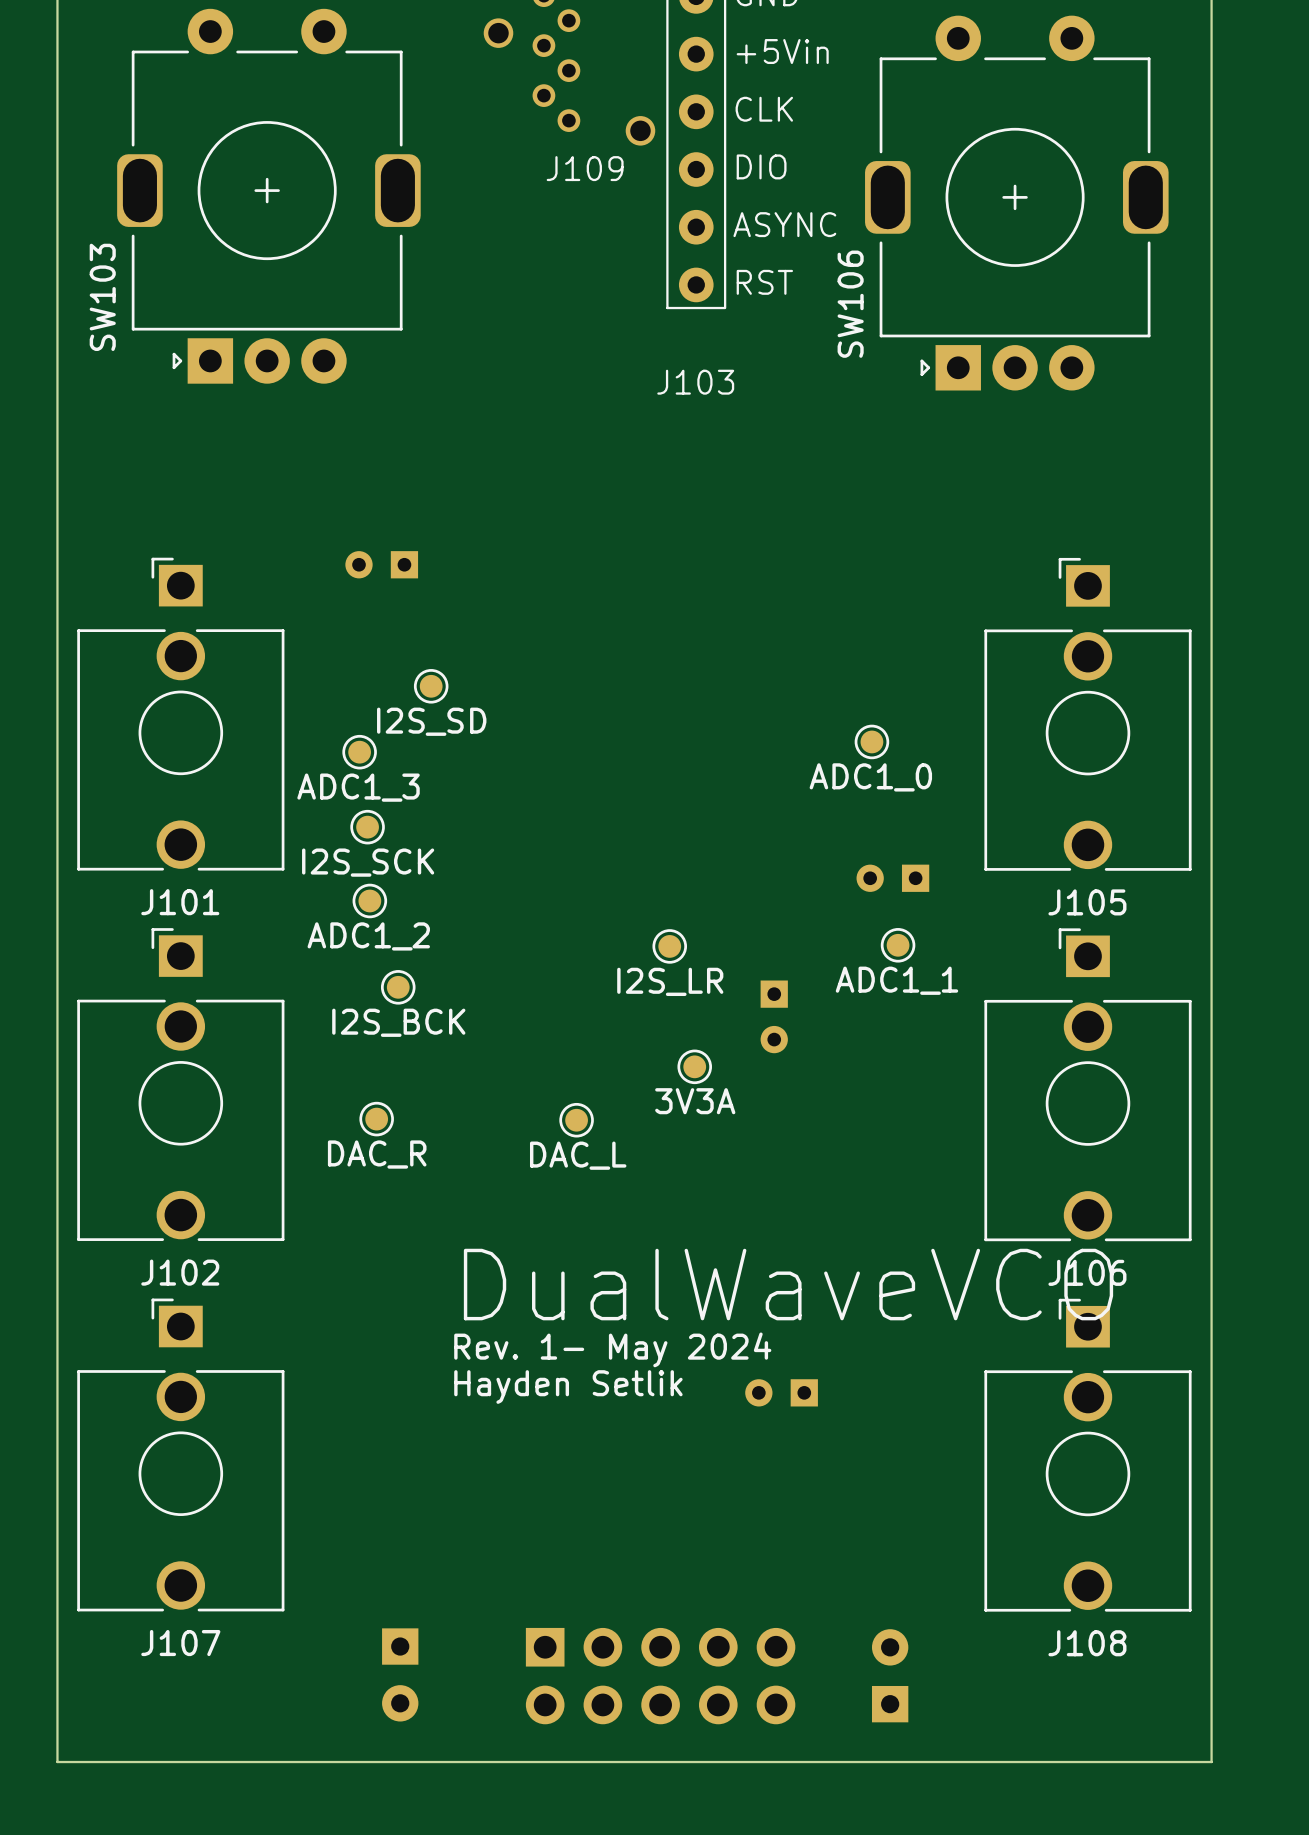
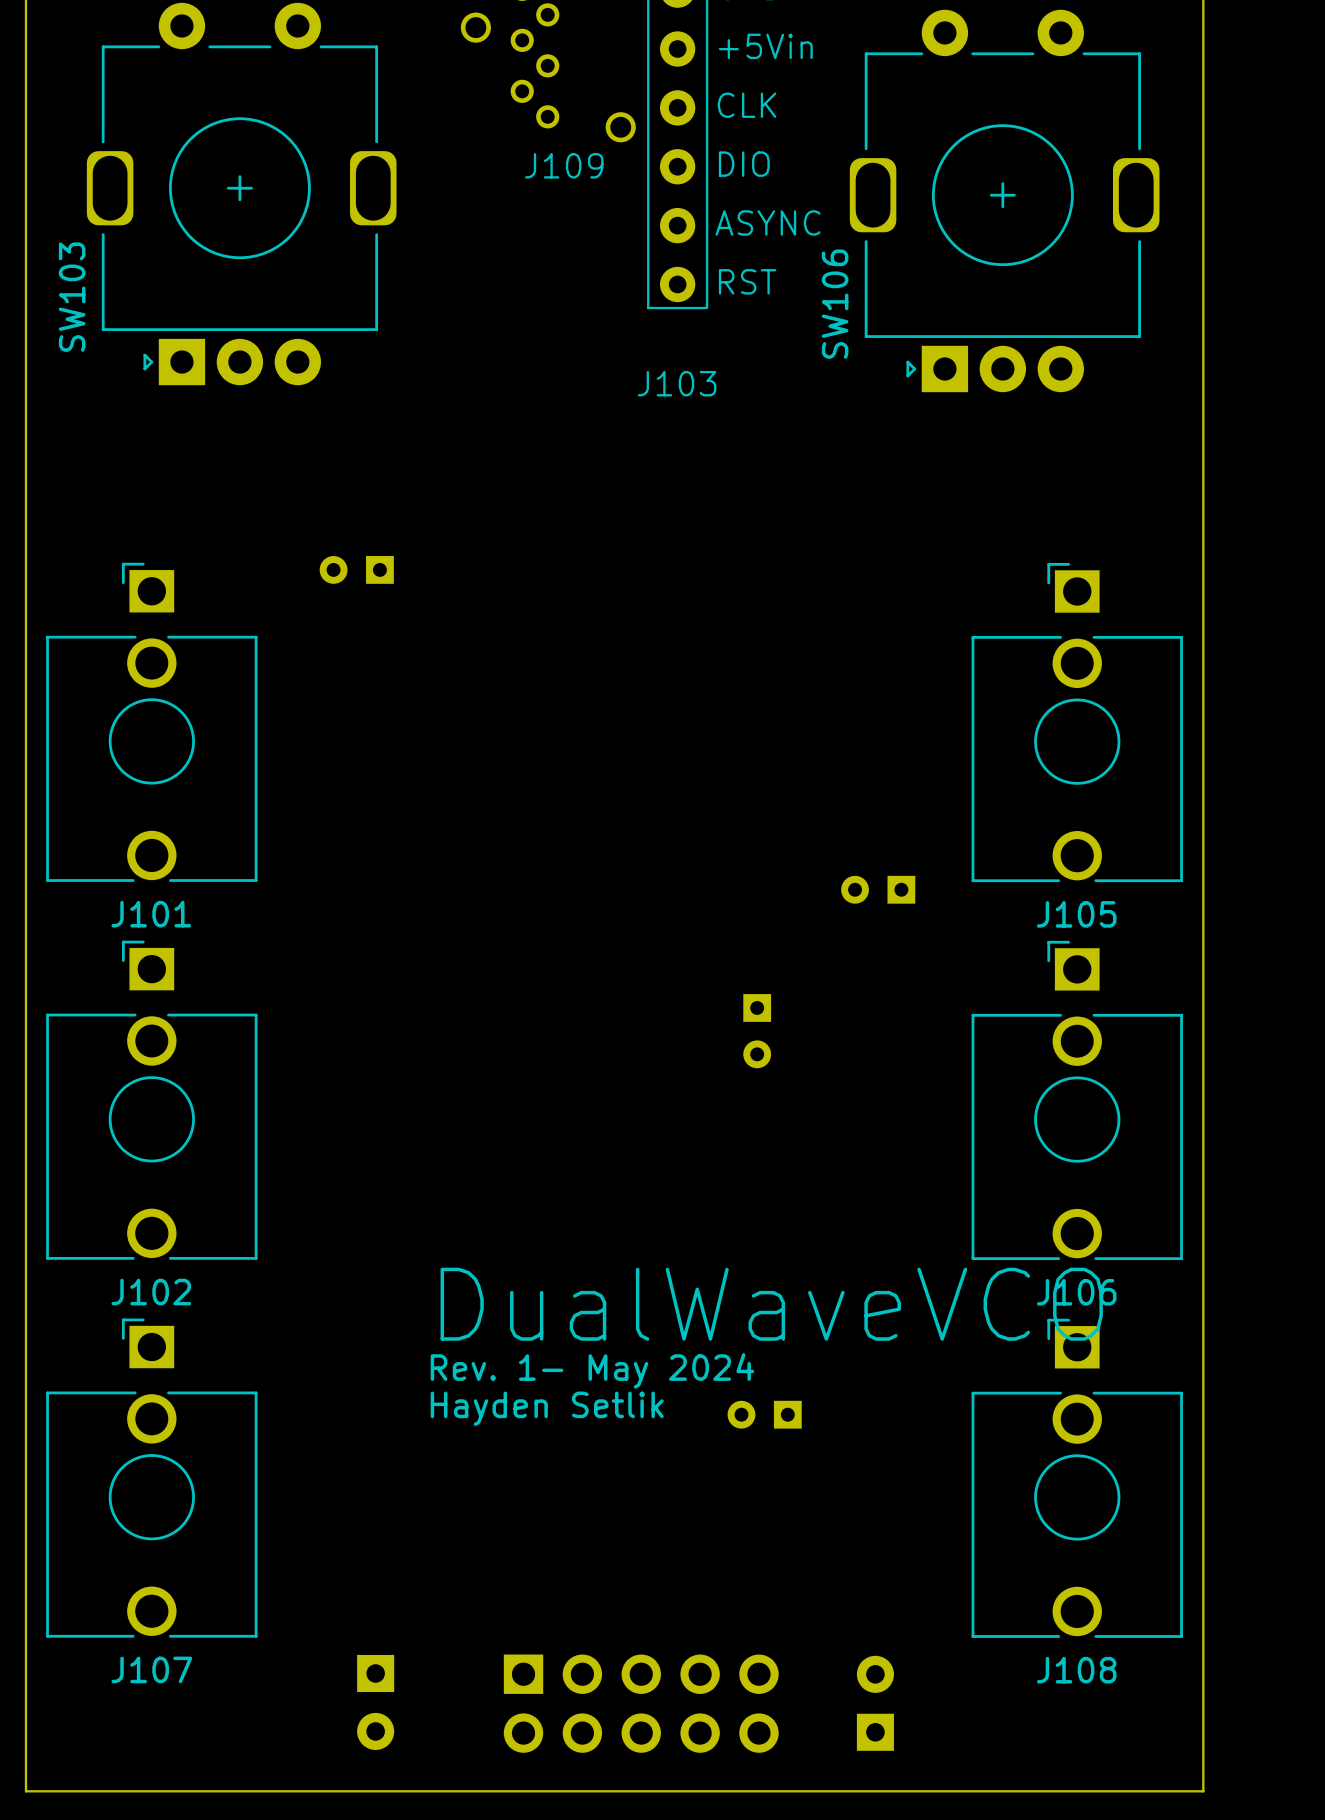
part: I2S_SD (431, 686) -> none
part: ADC1_0 (871, 741) -> none
part: ADC1_3 (359, 752) -> none
part: I2S_SCK (367, 827) -> none
part: ADC1_2 (369, 900) -> none
part: ADC1_1 (898, 945) -> none
part: I2S_LR (669, 946) -> none
part: I2S_BCK (398, 987) -> none
part: 3V3A (694, 1066) -> none
part: DAC_R (376, 1119) -> none
part: DAC_L (576, 1120) -> none

